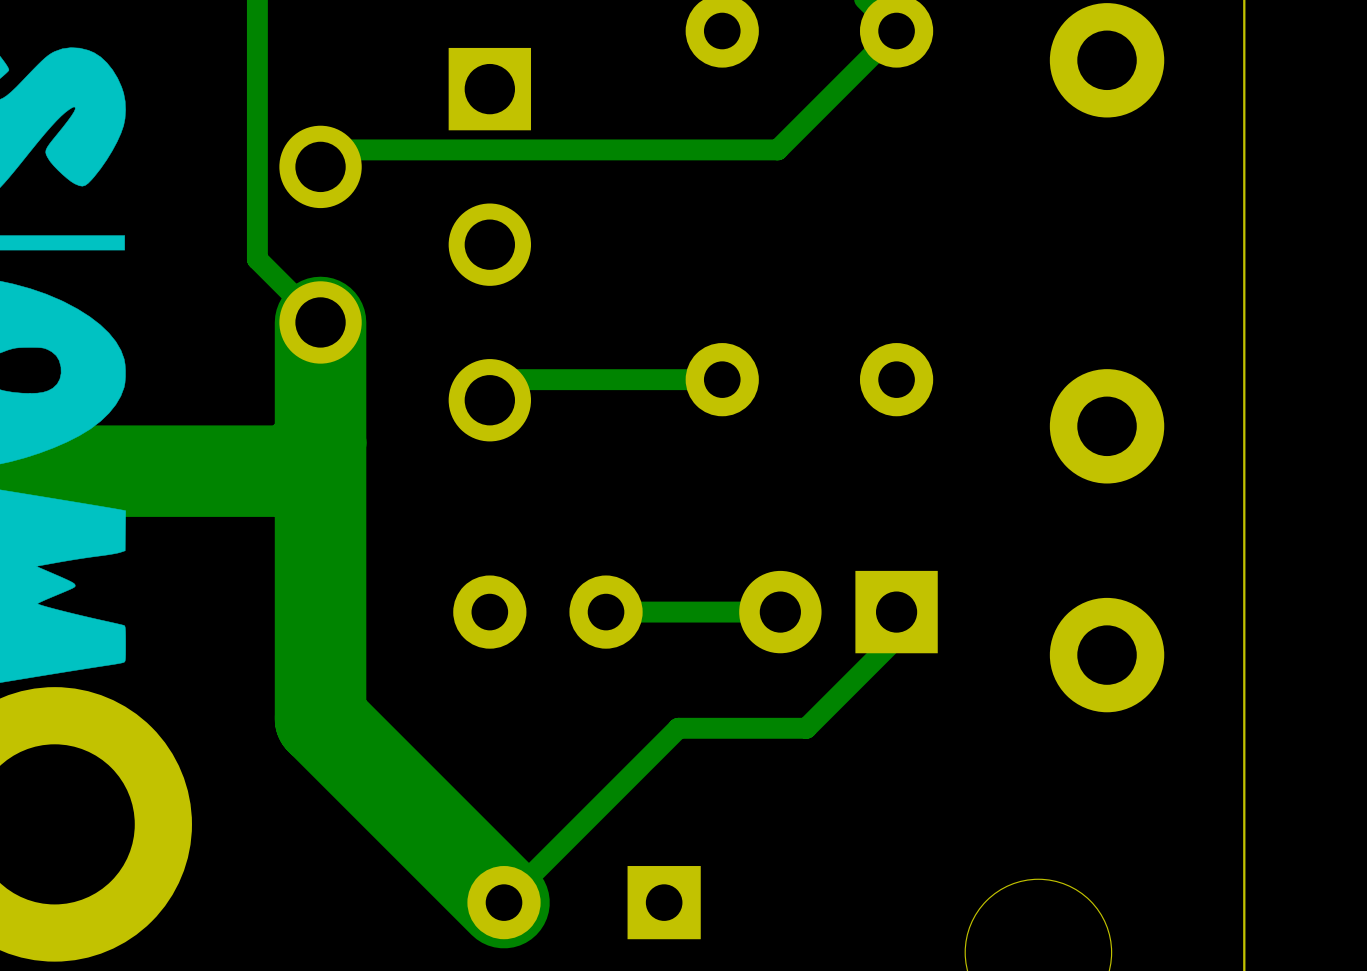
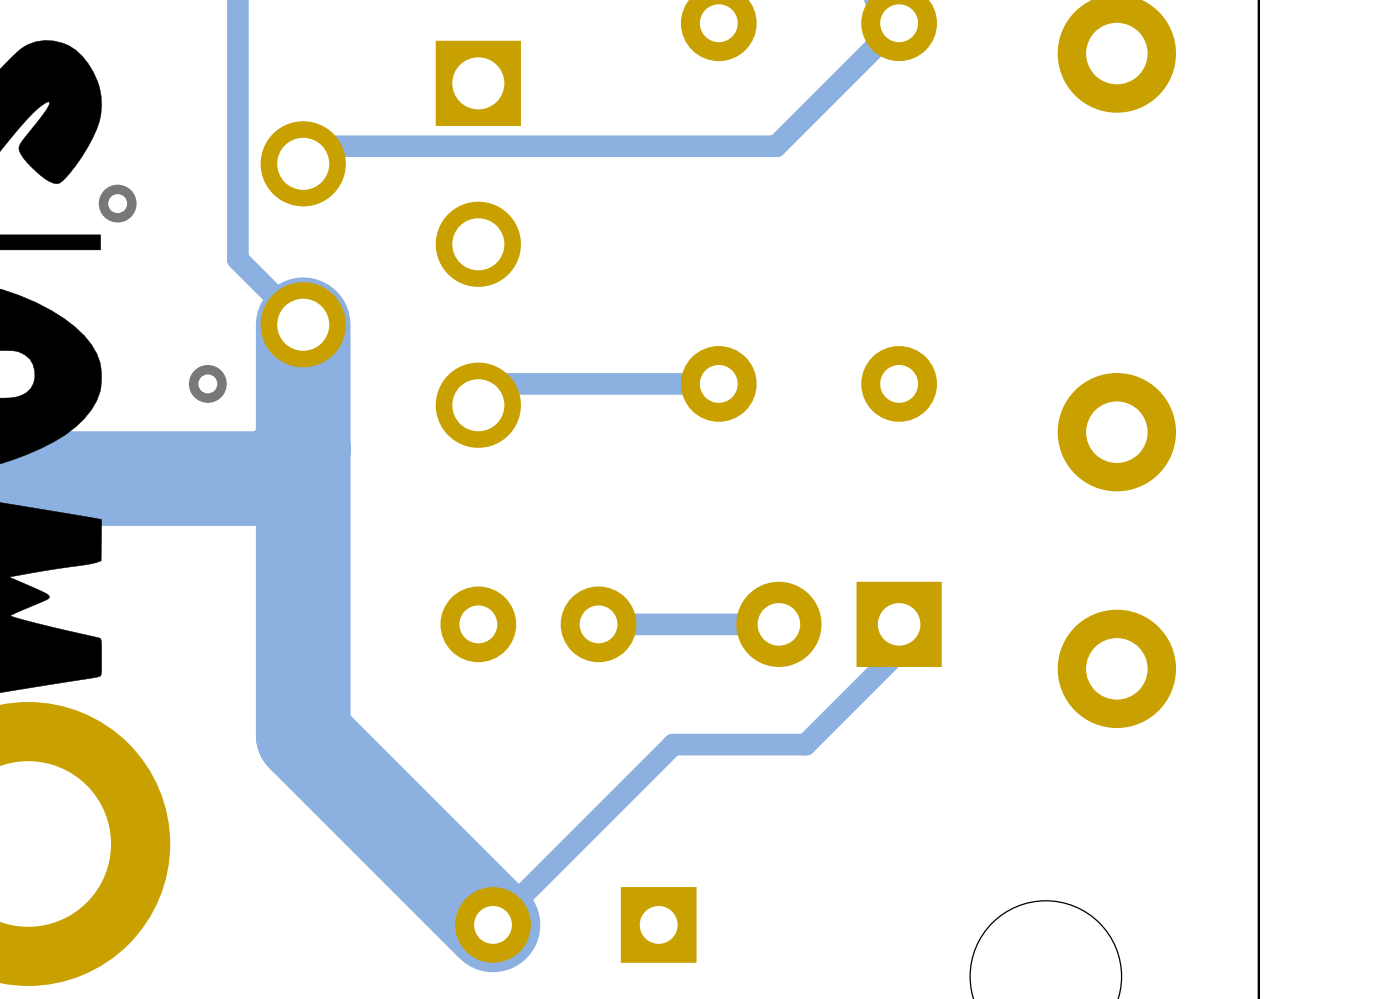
via: none -> (117, 203)
via: none -> (207, 383)

